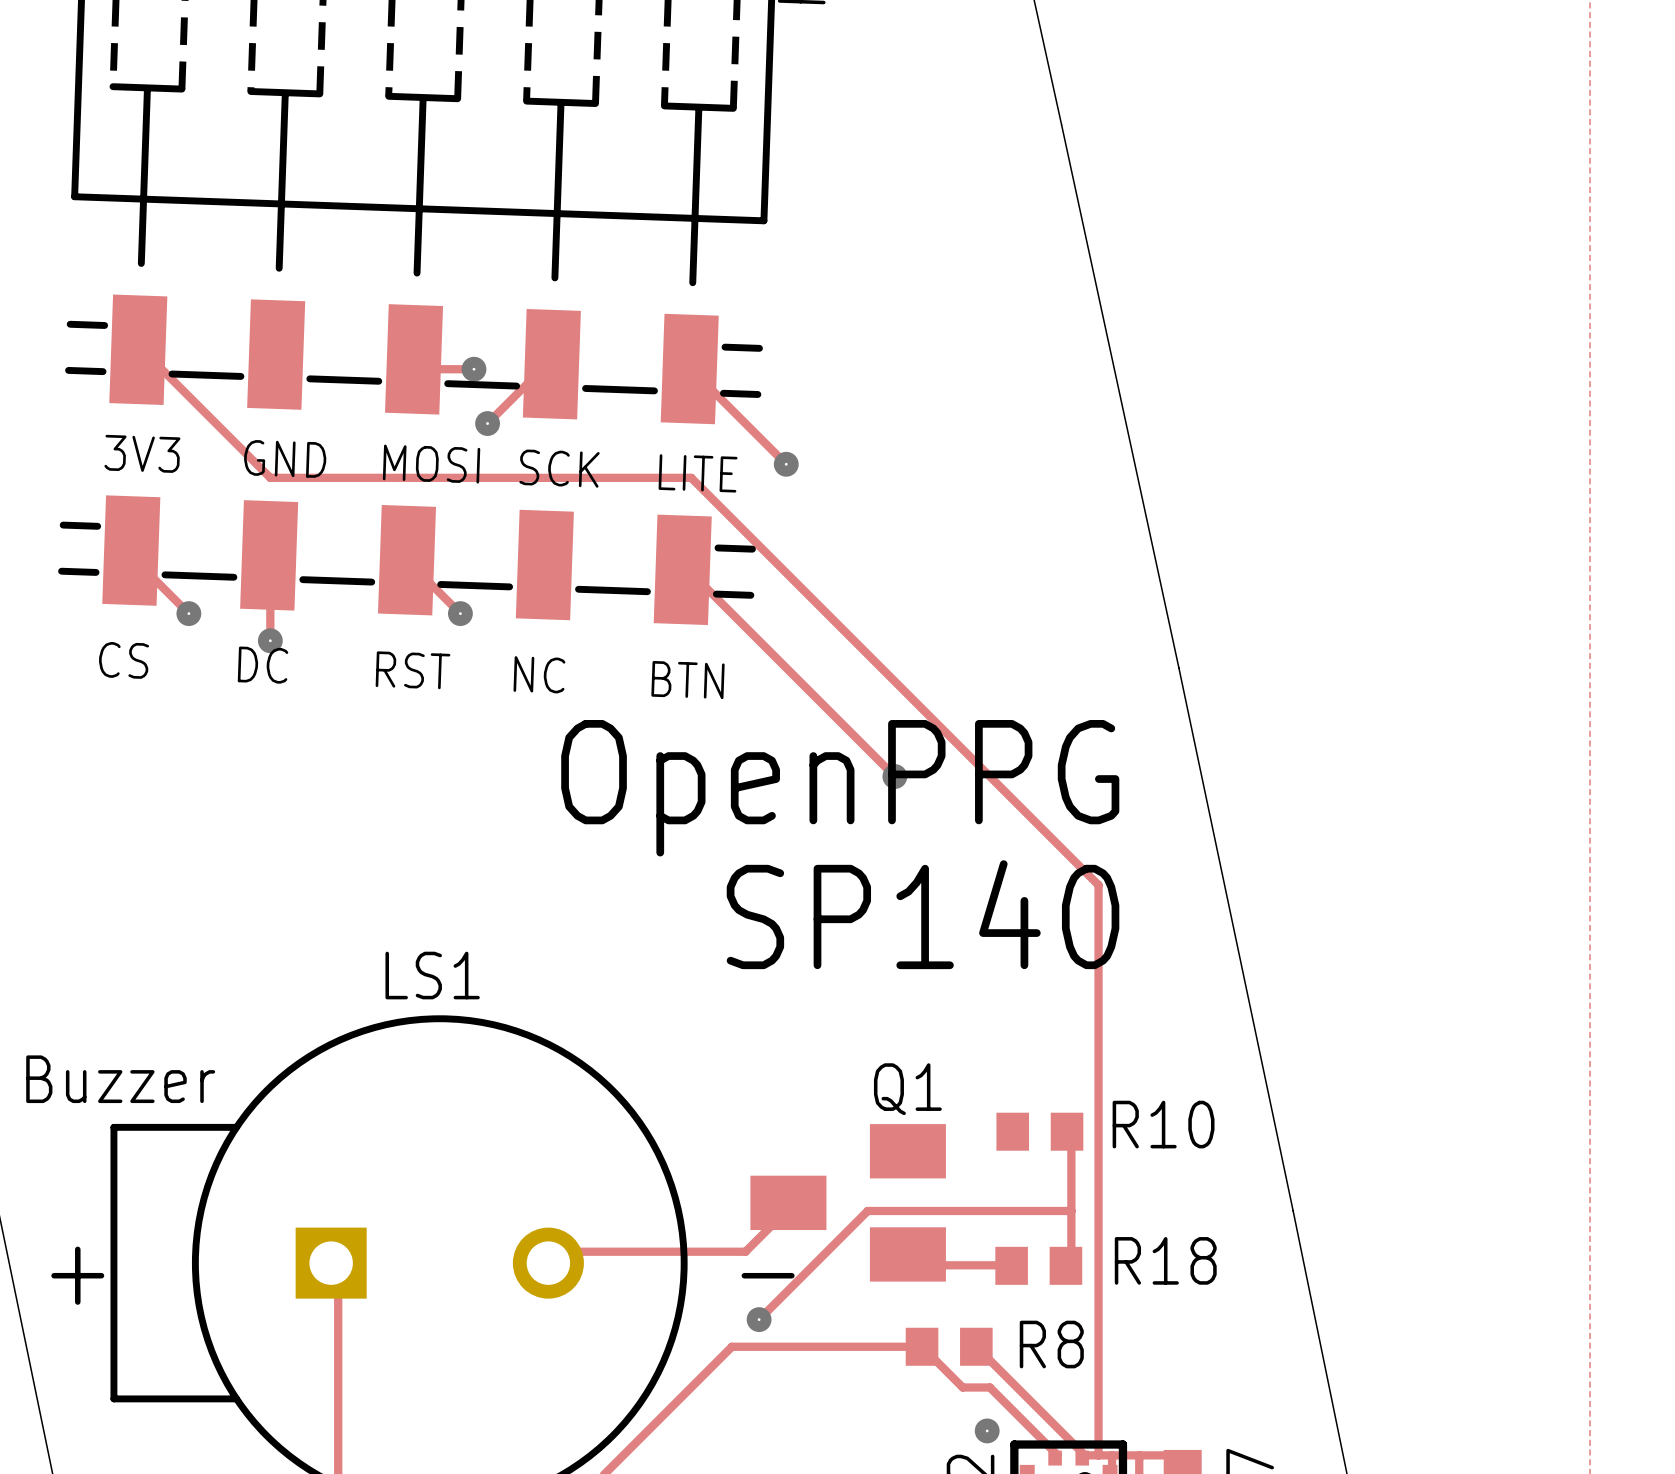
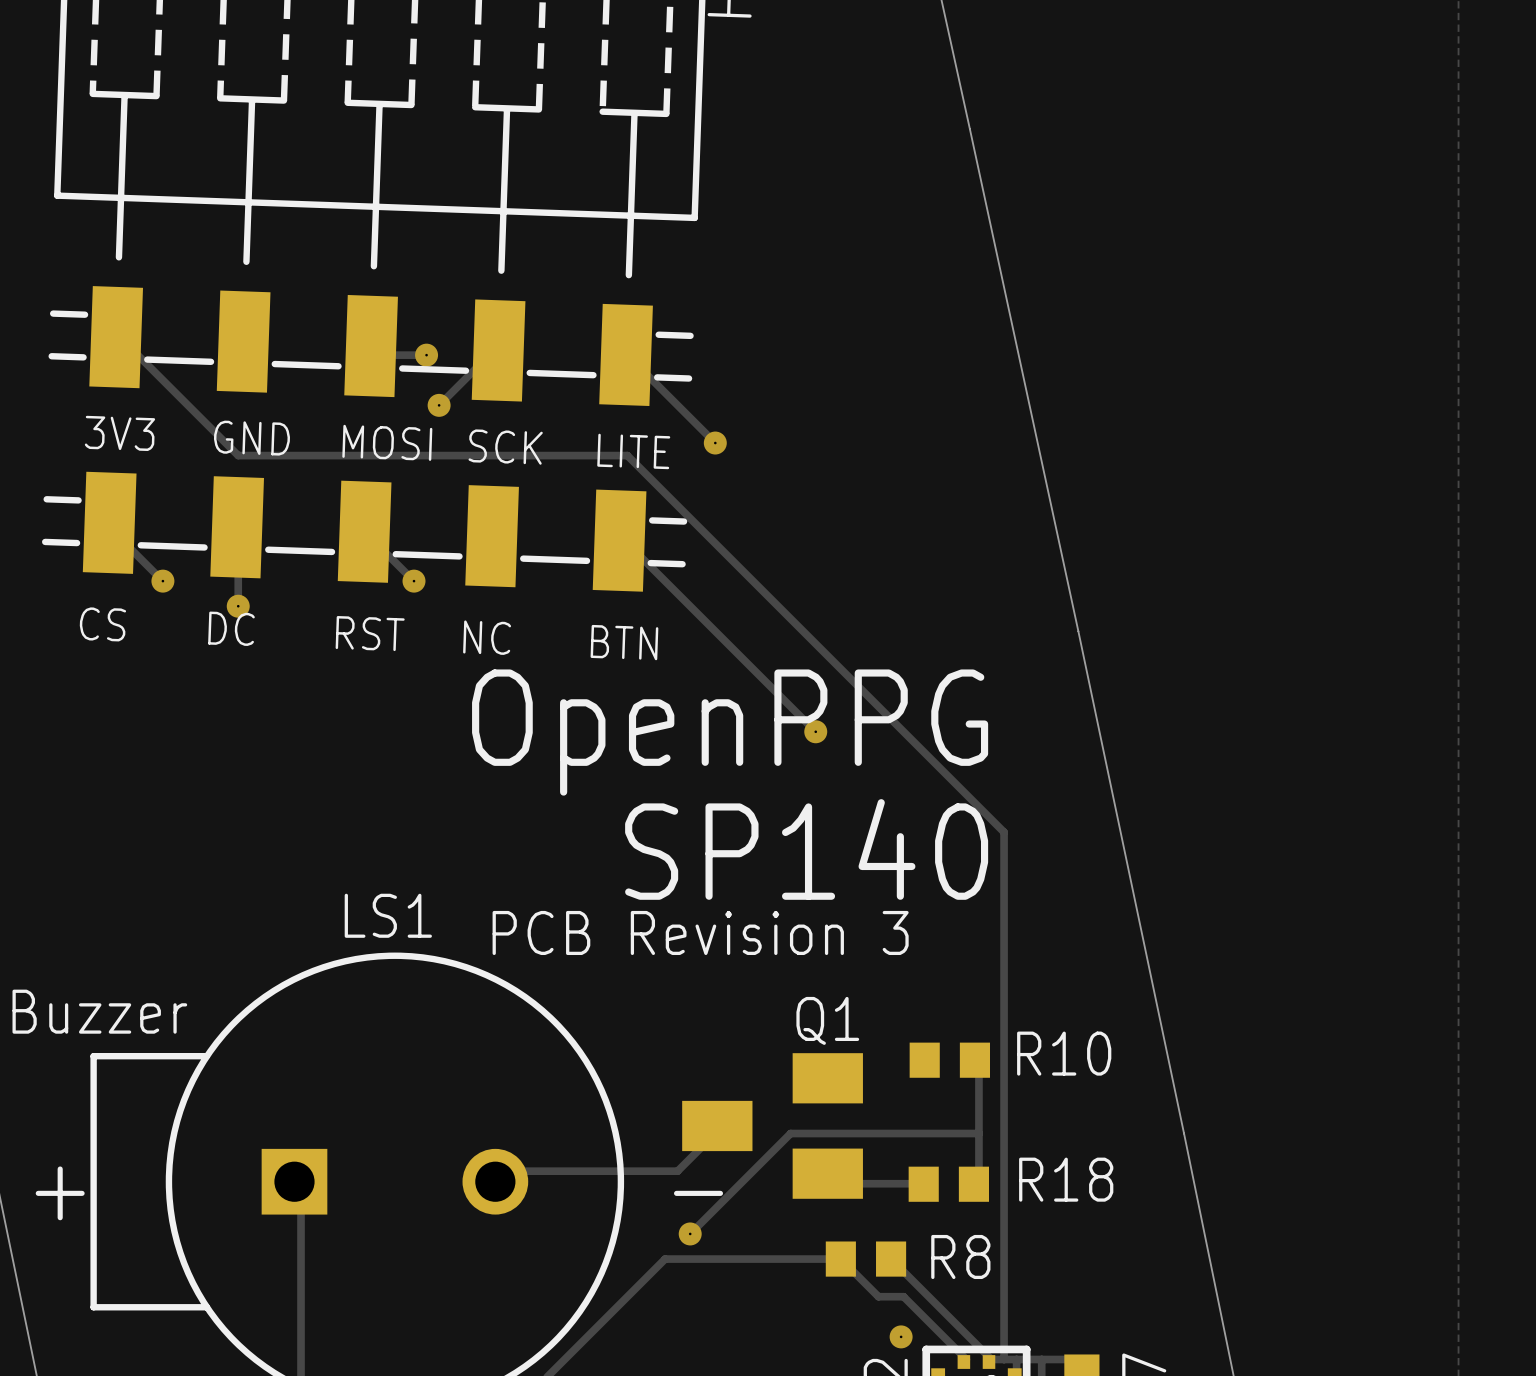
text position: OpenPPG (840, 788) -> OpenPPG (730, 732)
text position: SP140 (923, 914) -> SP140 (806, 849)
text: none -> PCB Revision 3 (700, 932)

